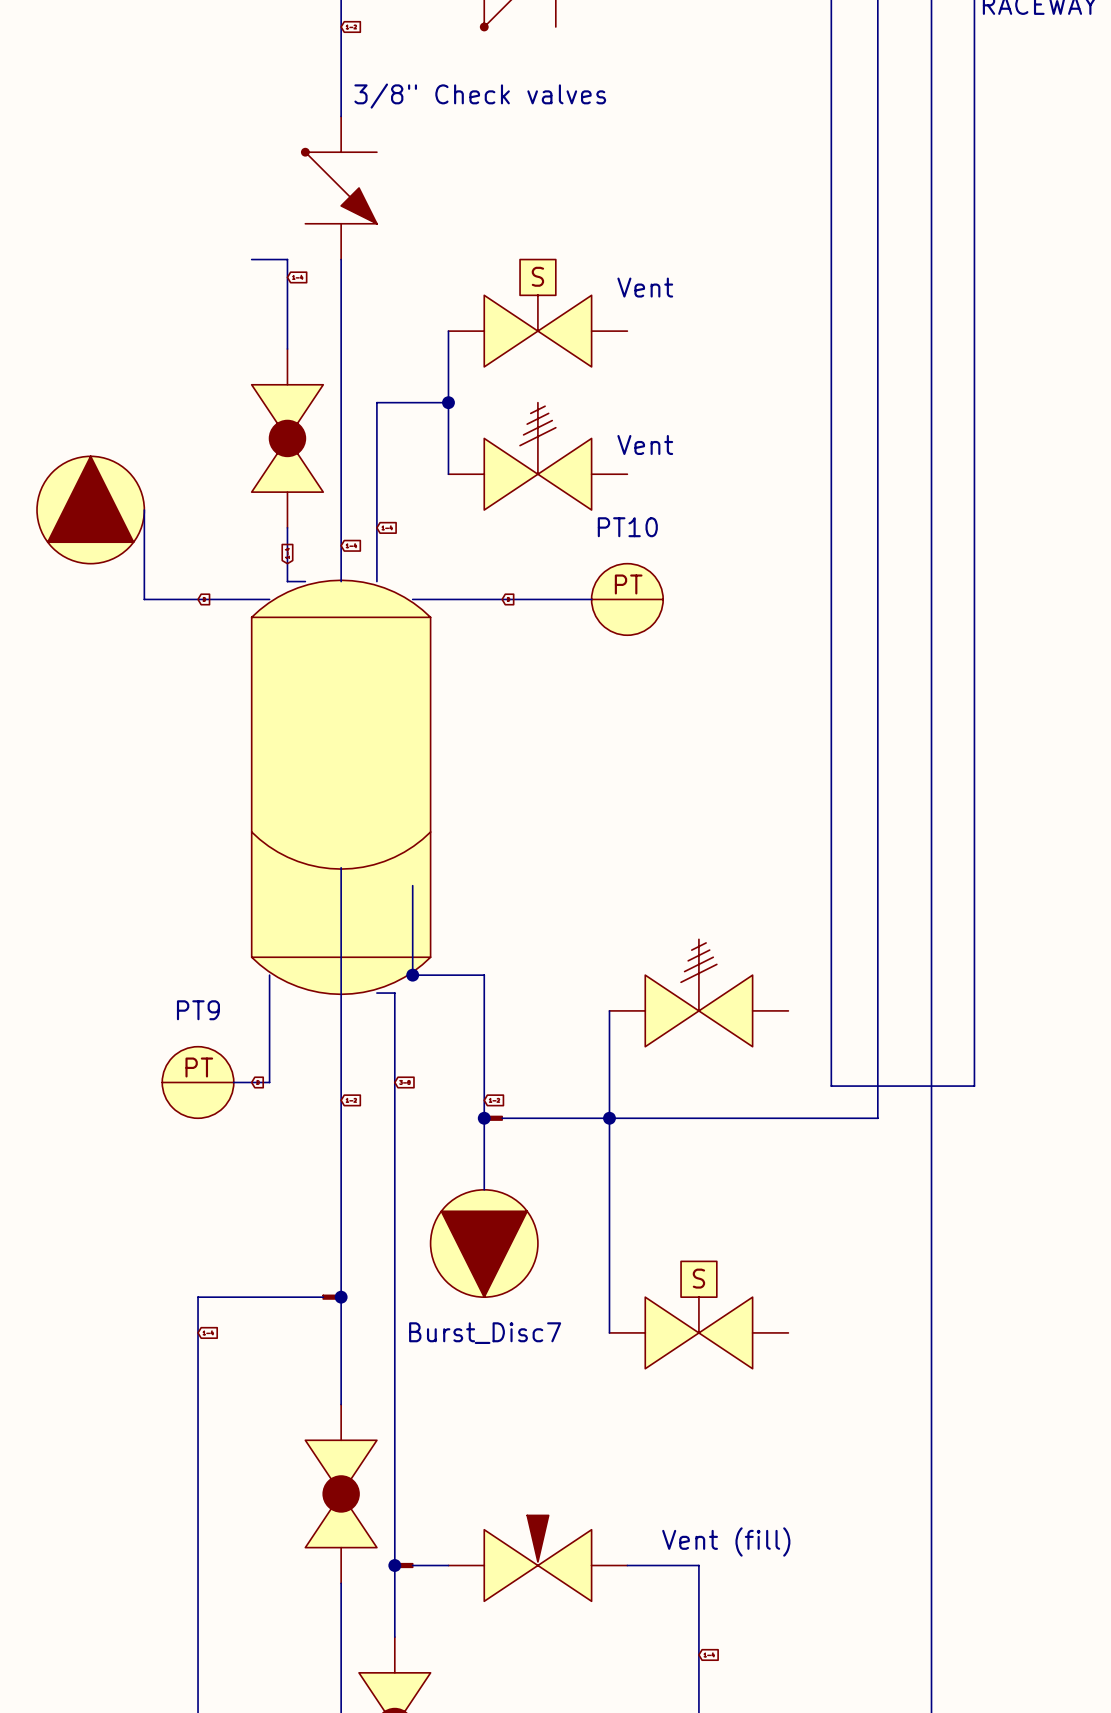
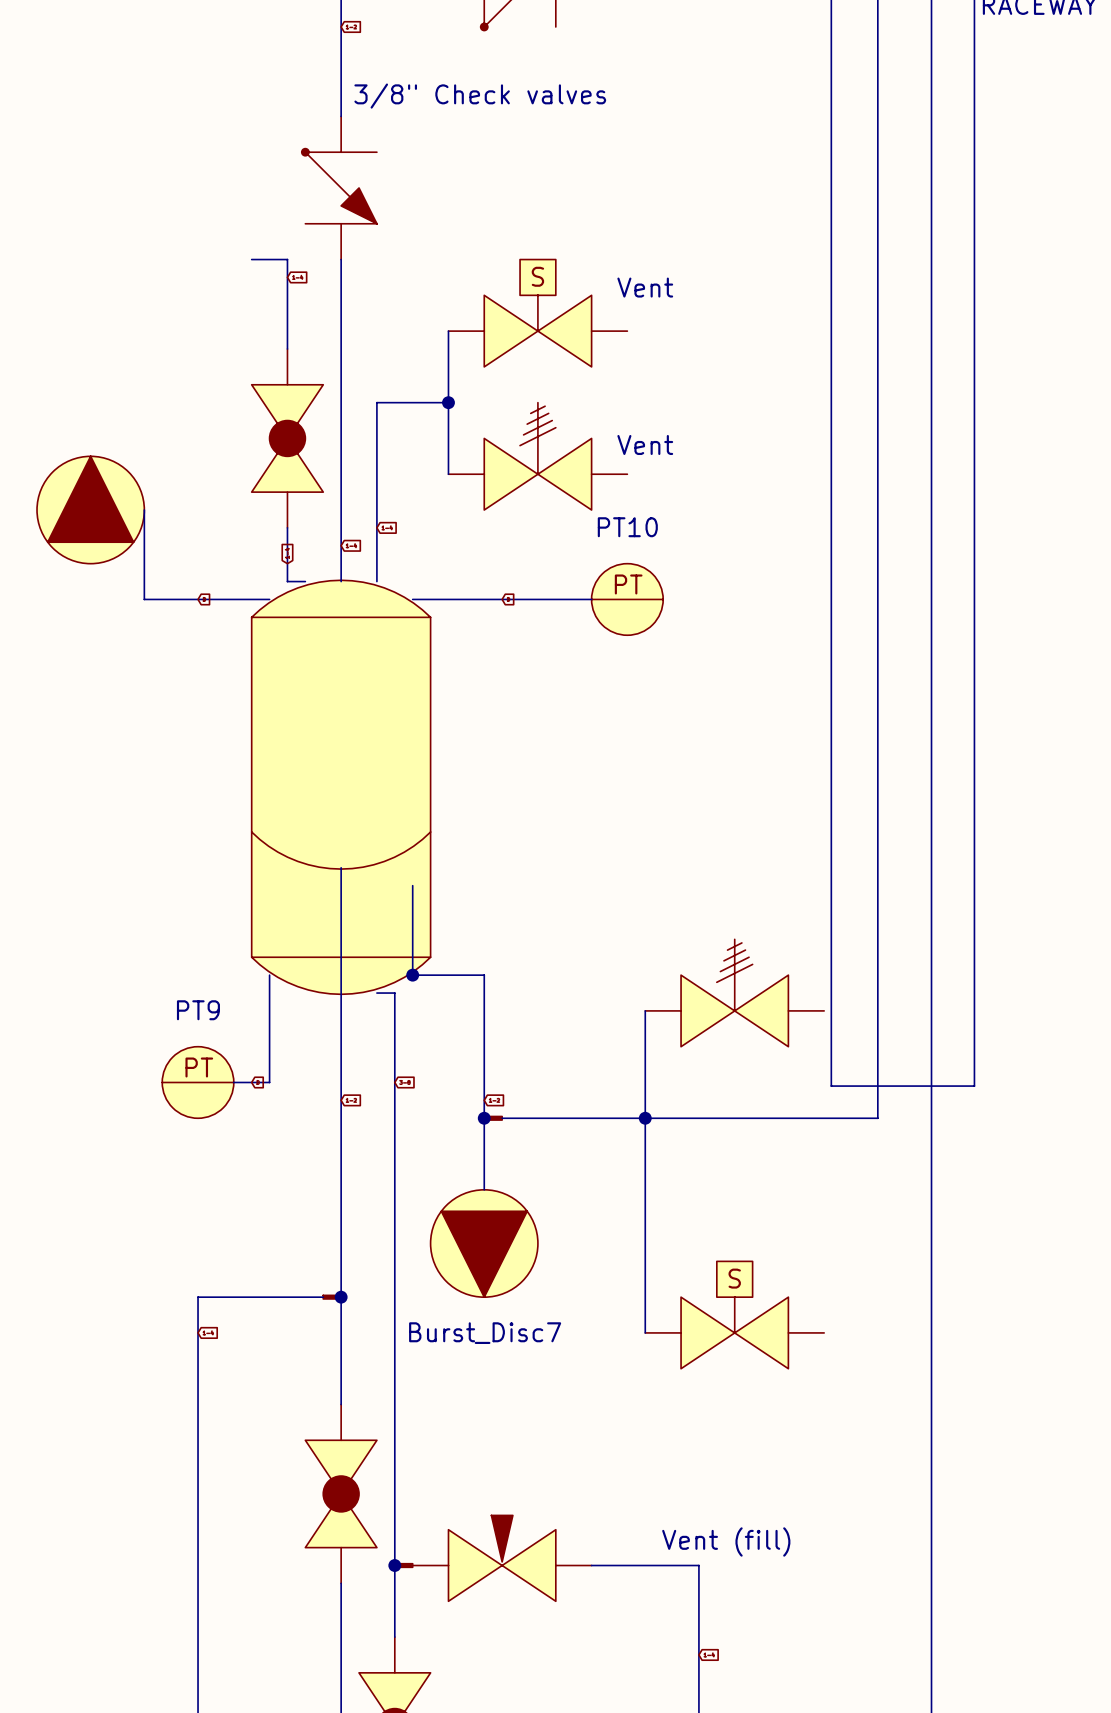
part position: (698, 993) -> (734, 993)
wire: (609, 1010) (609, 1332) -> (645, 1010) (645, 1332)
junction position: (609, 1118) -> (645, 1118)
part position: (698, 1315) -> (734, 1315)
part position: (537, 1558) -> (502, 1558)

